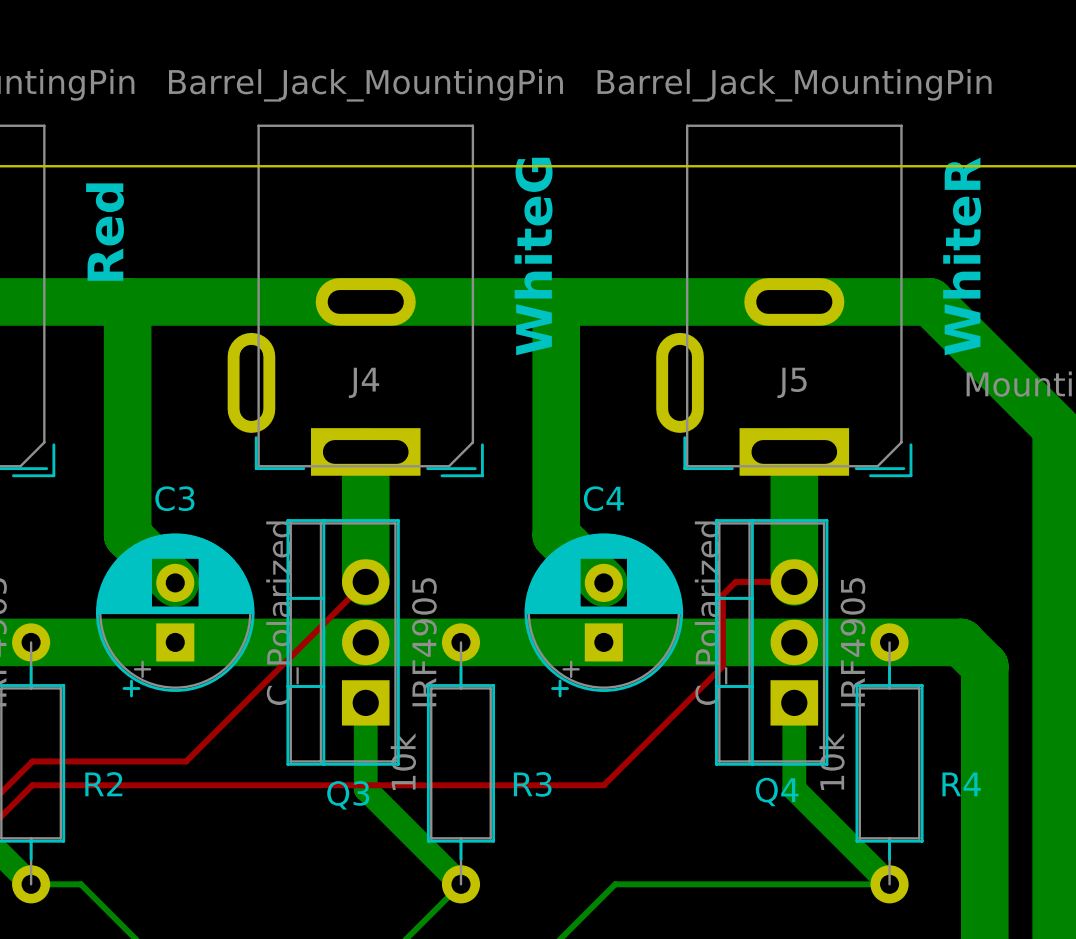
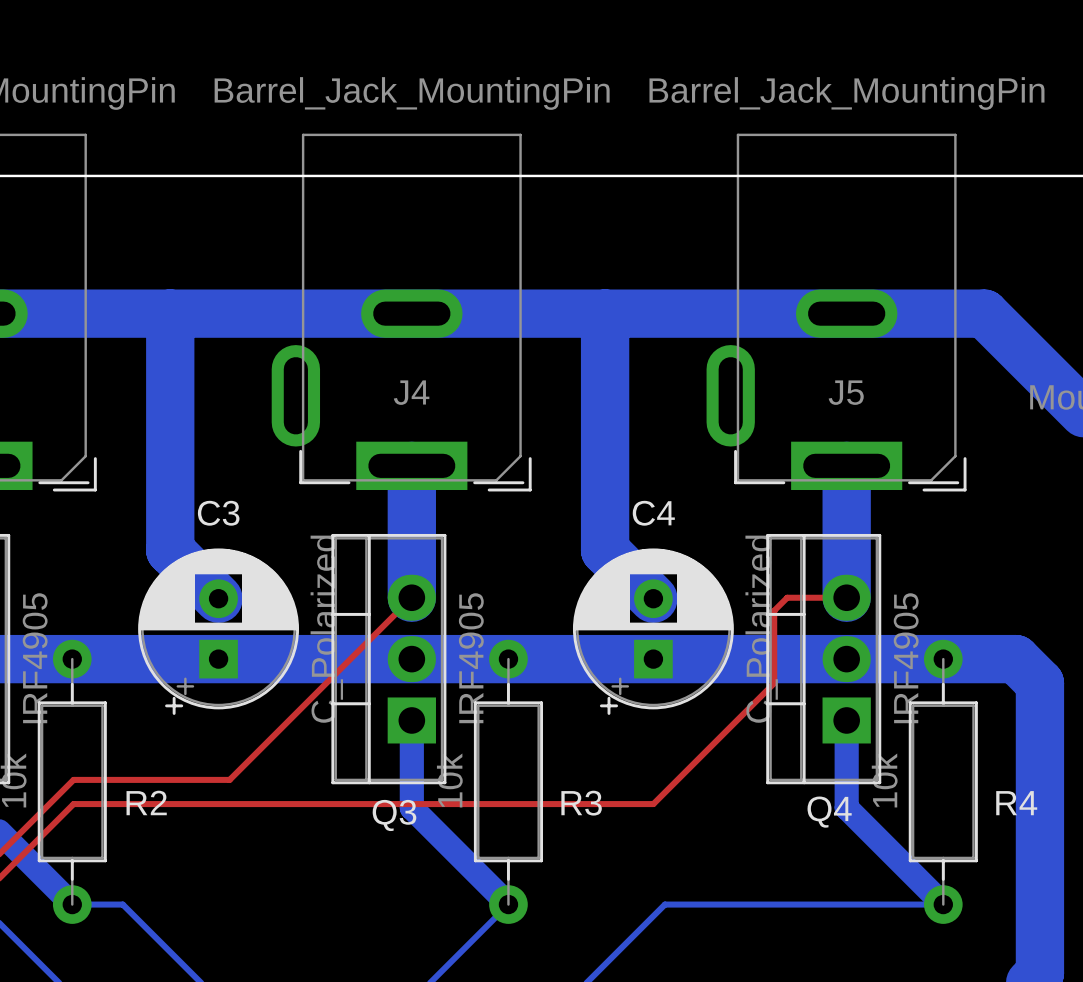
text: Red (105, 232) -> none
text: WhiteG (533, 256) -> none
text: WhiteR (962, 256) -> none

